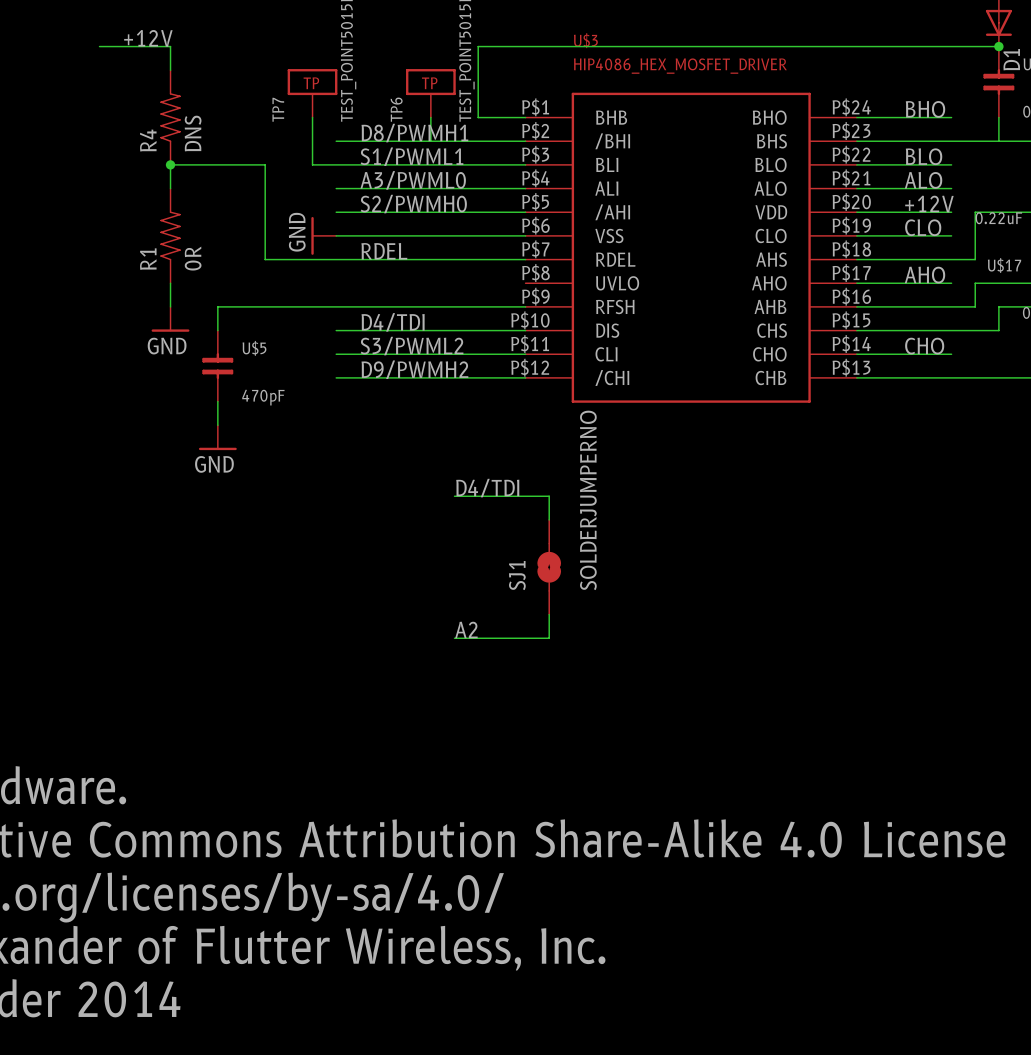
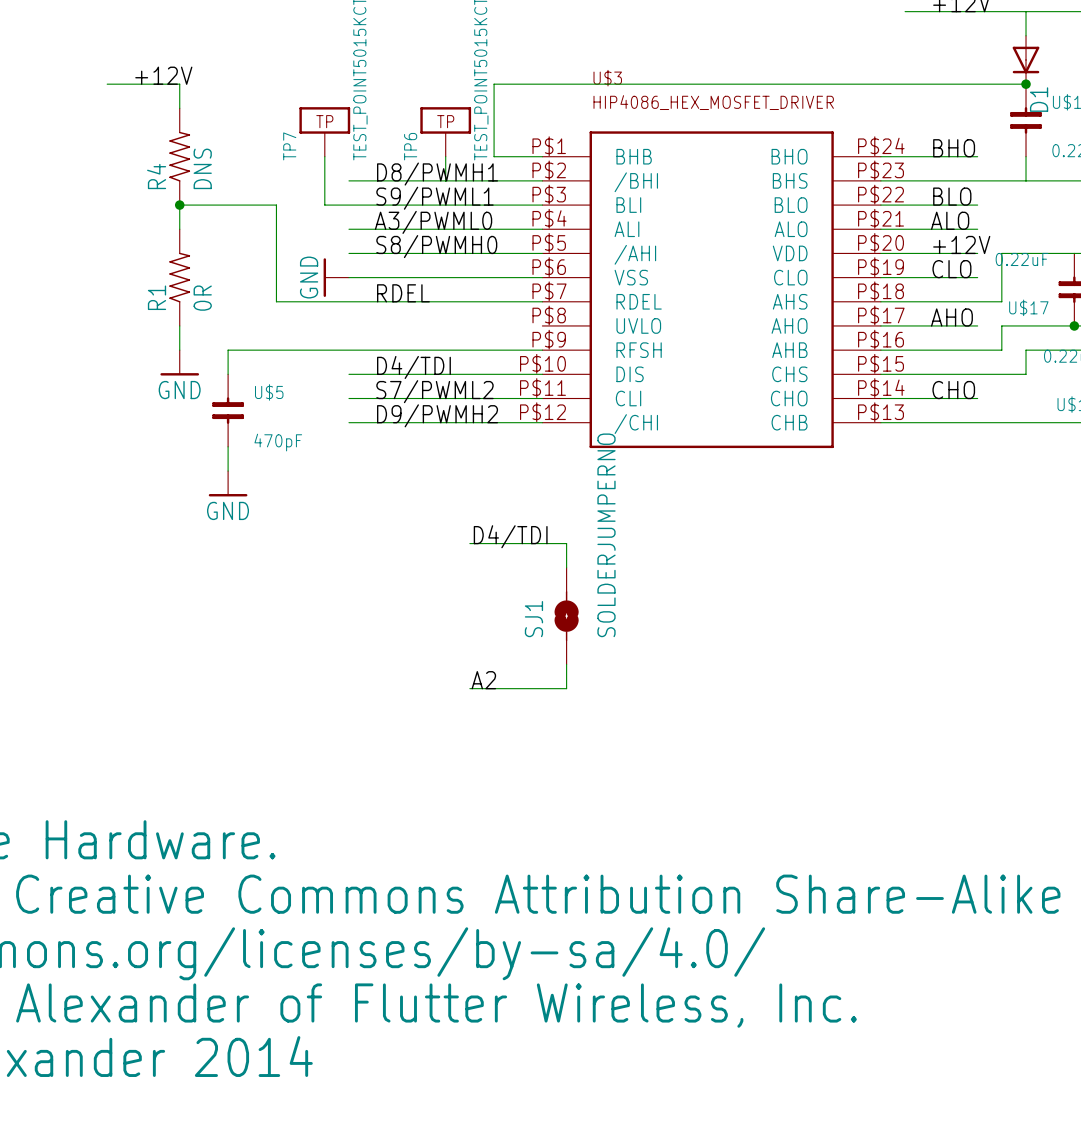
label: S1/PWML1 (412, 156) -> S9/PWML1 (434, 198)
label: S2/PWMH0 (413, 204) -> S8/PWMH0 (436, 246)
label: S3/PWML2 (412, 346) -> S7/PWML2 (434, 391)

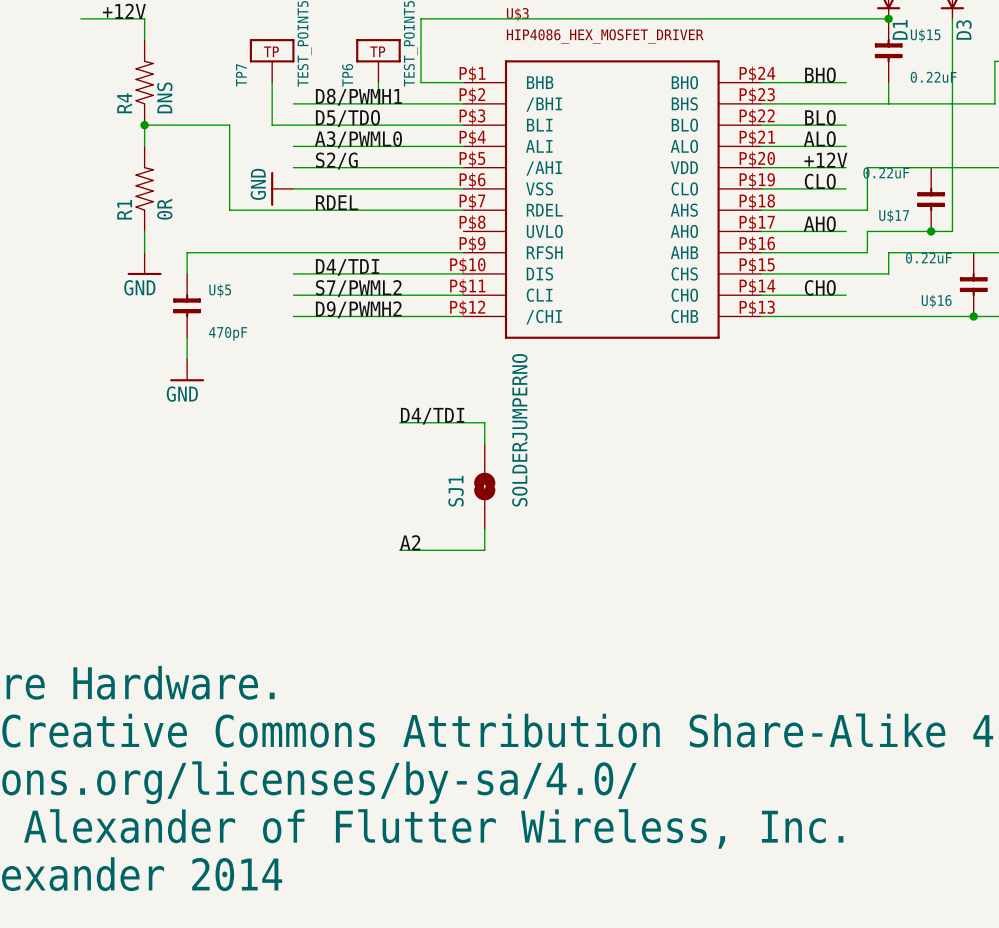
label: S9/PWML1 (434, 198) -> D5/TDO (347, 118)
label: S8/PWMH0 (436, 246) -> S2/G (336, 161)

